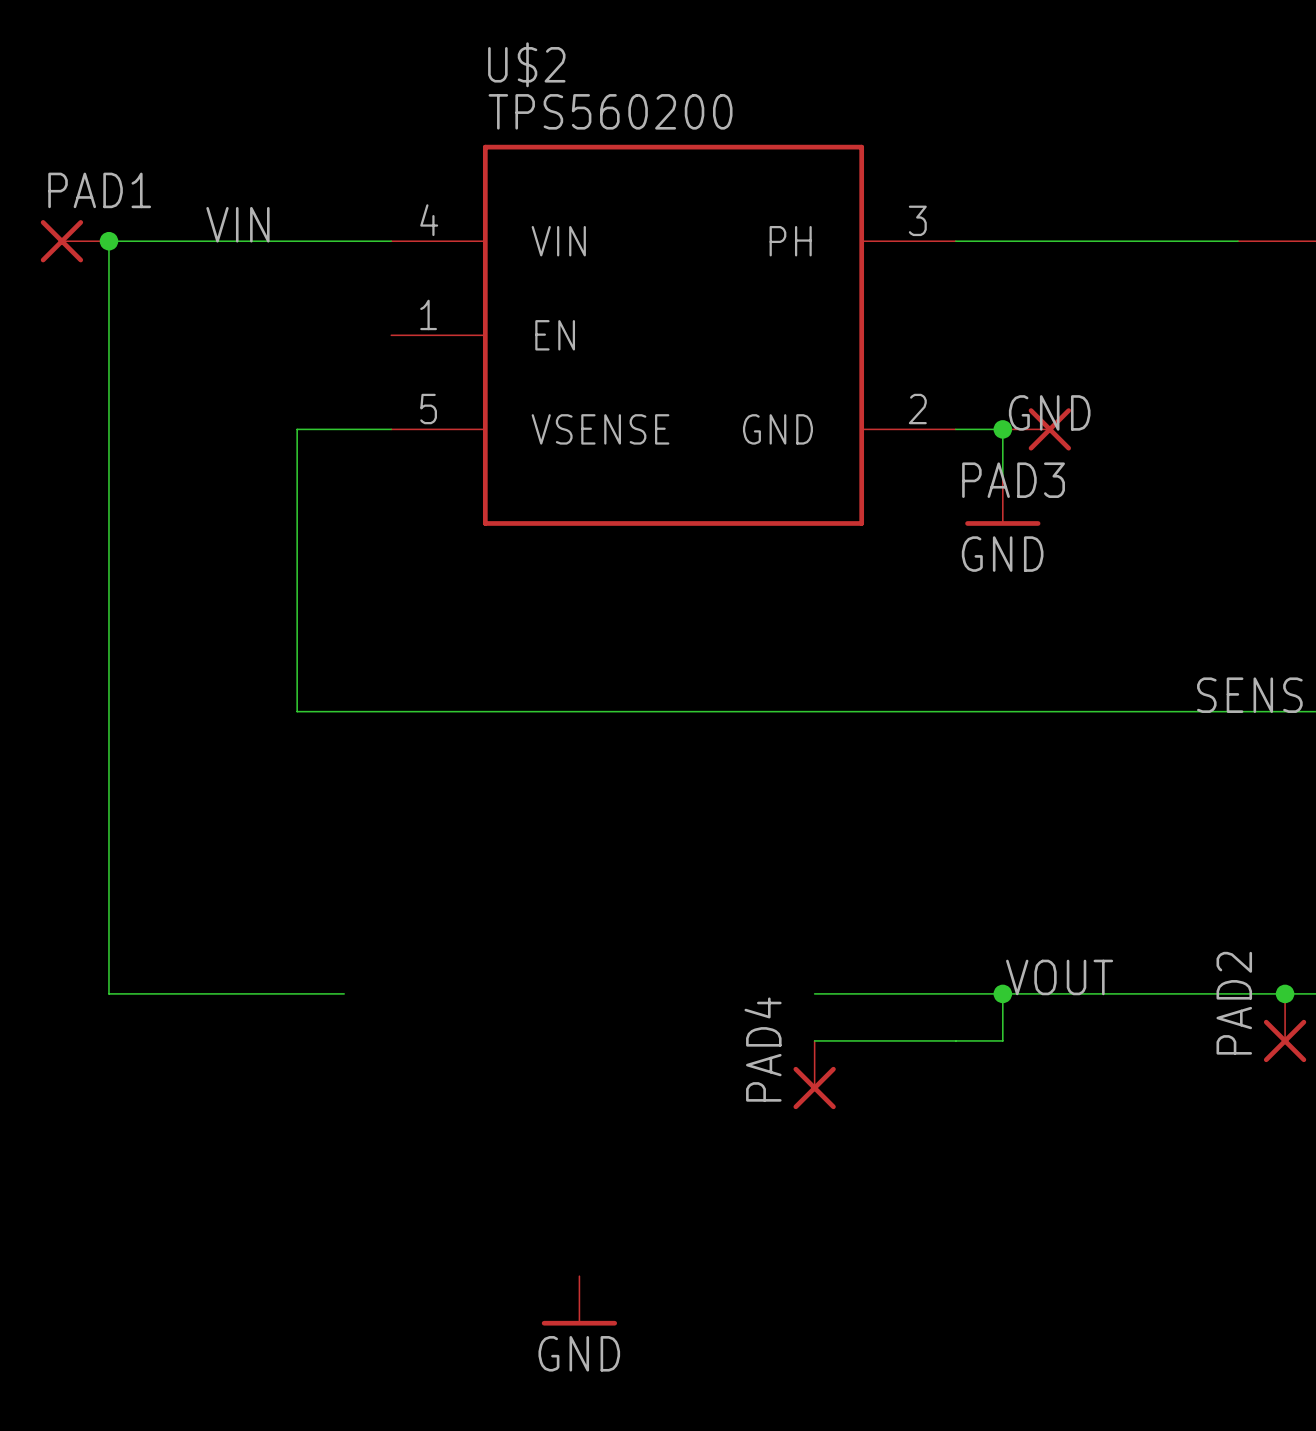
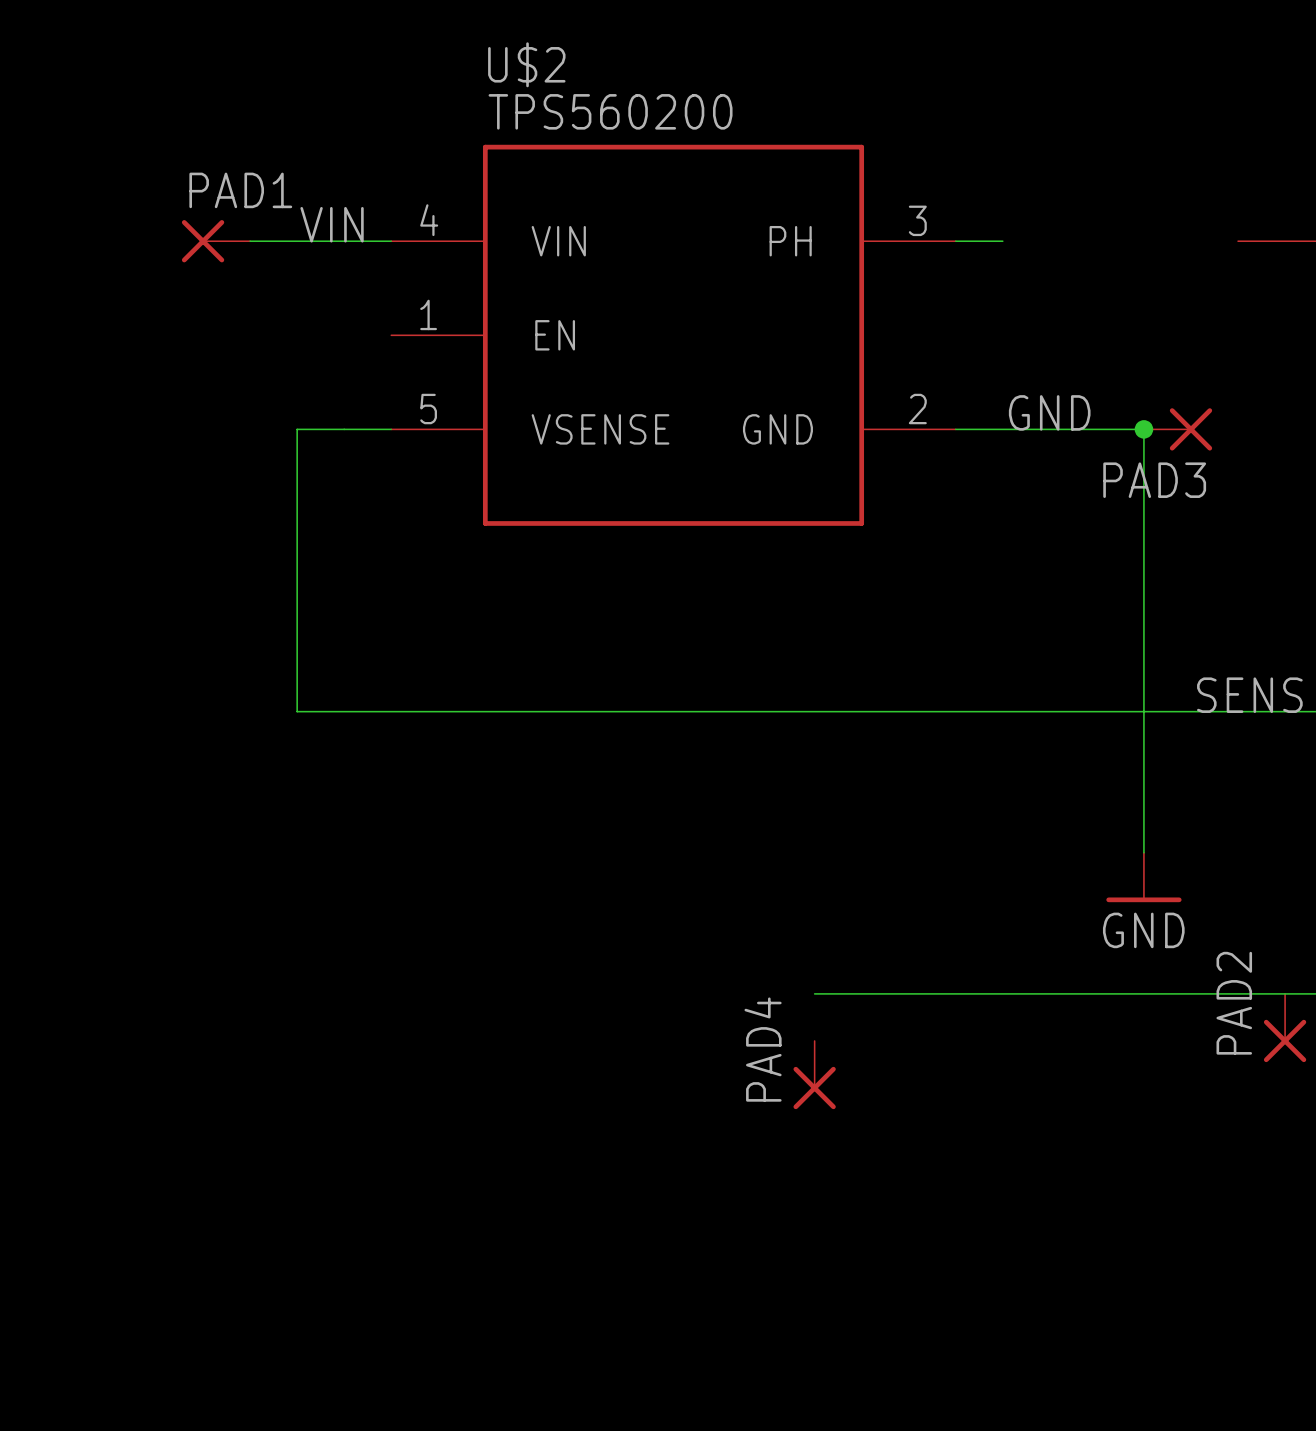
label position: VIN (237, 224) -> VIN (332, 224)
PAD1 position: (74, 241) -> (216, 241)
junction: (108, 241) -> none
wire: (250, 241) (108, 241) (108, 993) (344, 993) -> none
wire: (1002, 241) (1238, 241) -> none
wire: (1002, 429) (1002, 476) -> (1002, 429) (1143, 429) (1143, 852)
junction: (1002, 429) -> none
PAD3 position: (1036, 429) -> (1178, 429)
junction: none -> (1143, 429)
power symbol: GND (1002, 501) -> none
power symbol: none -> GND (1143, 877)
label: VOUT (1059, 977) -> none
wire: (1002, 993) (1002, 1040) (814, 1040) -> none
junction: (1002, 993) -> none
junction: (1285, 993) -> none
power symbol: GND (579, 1300) -> none

